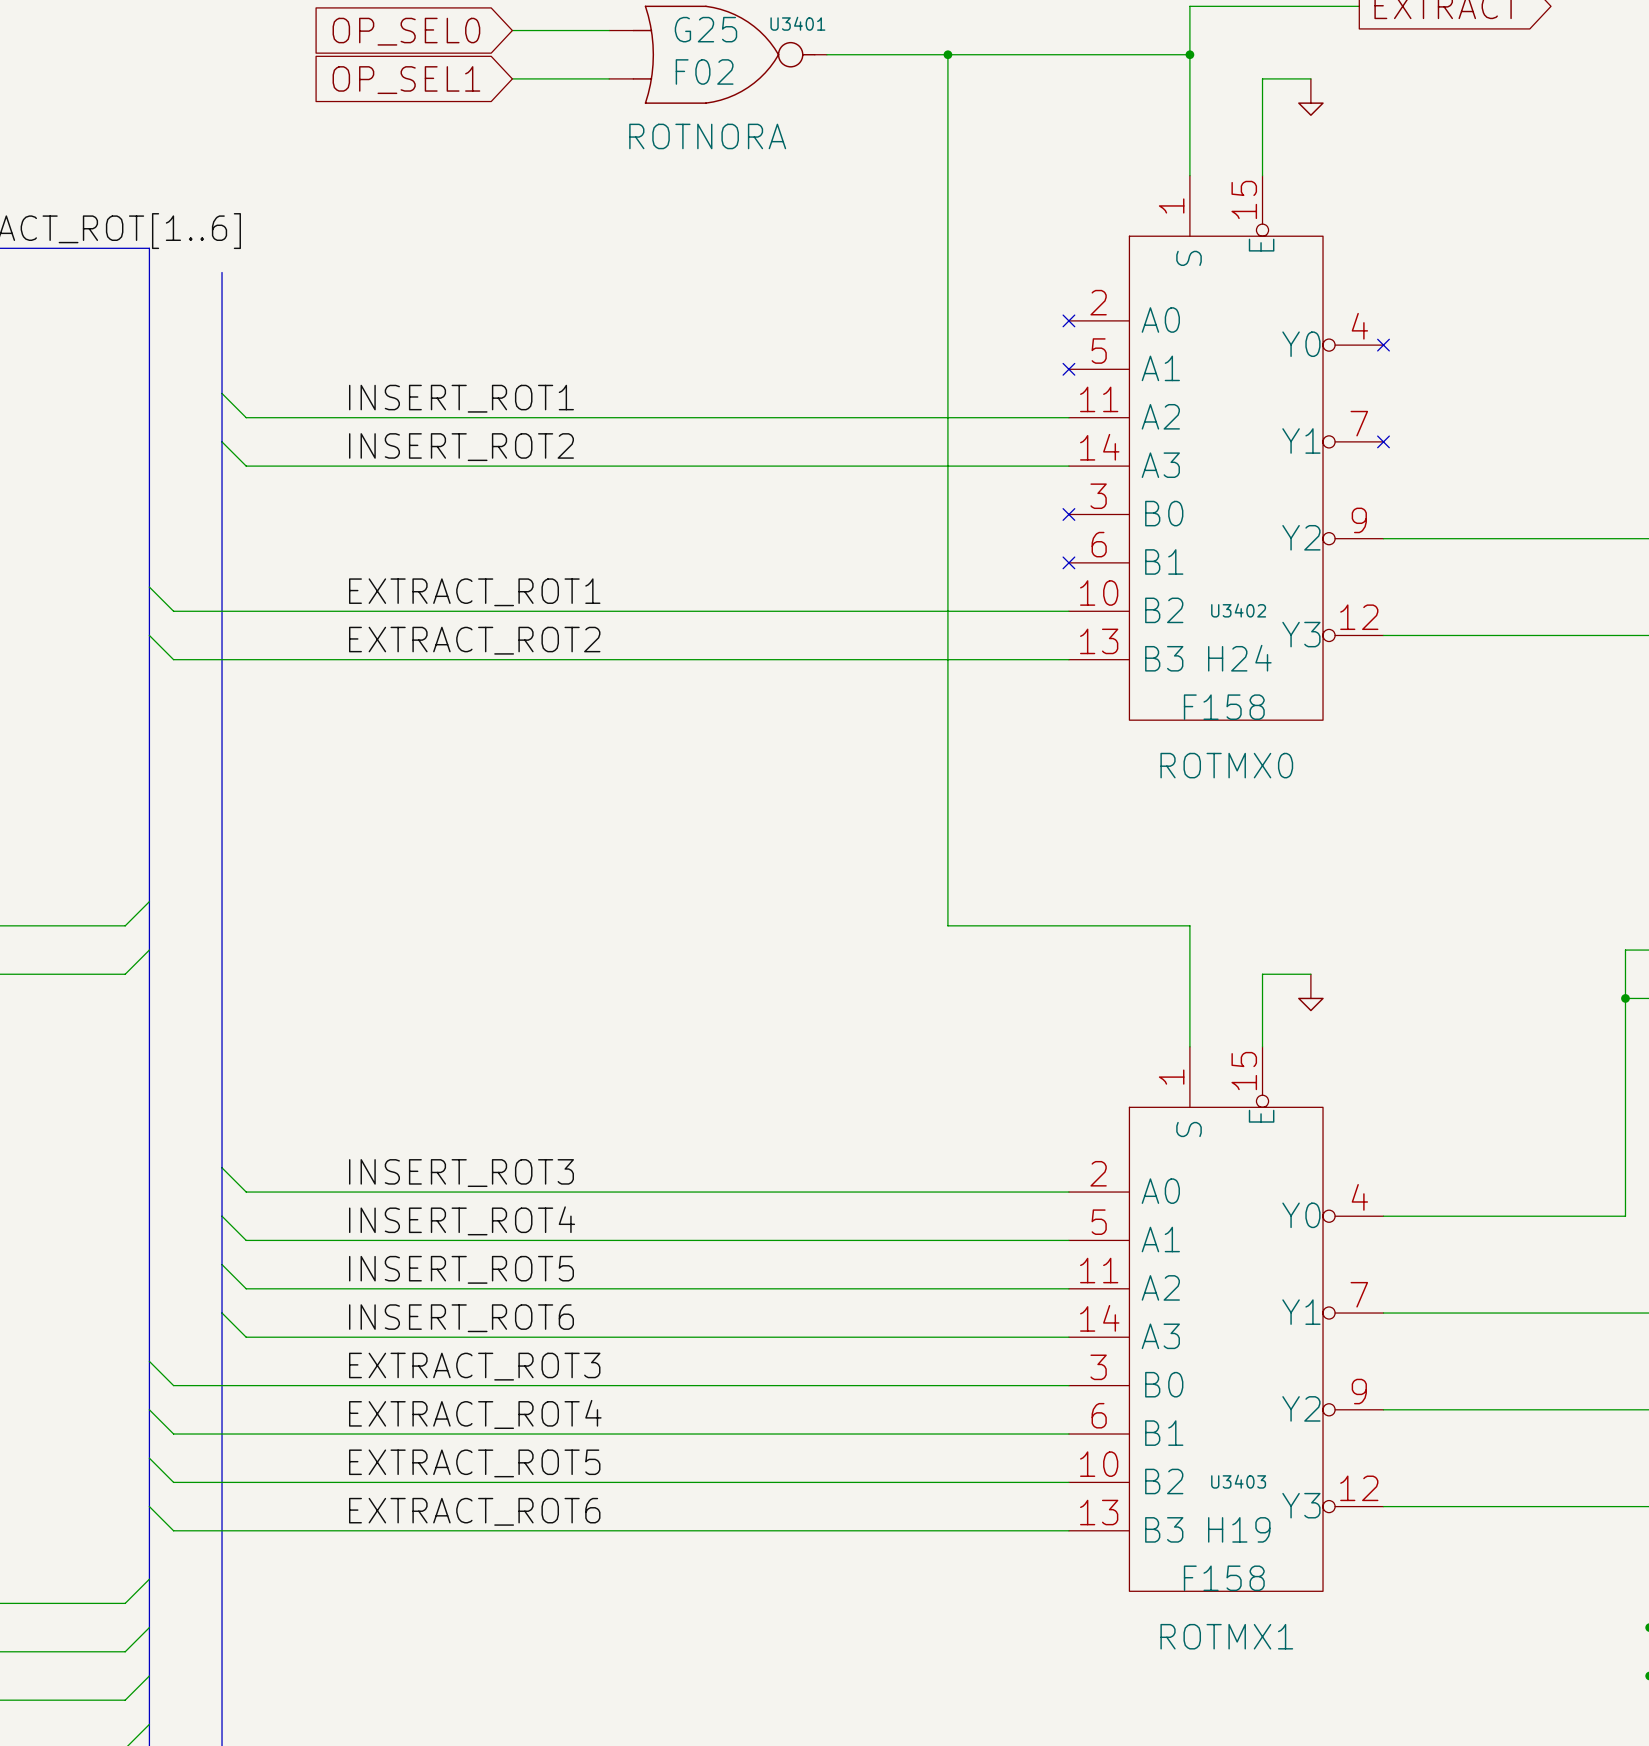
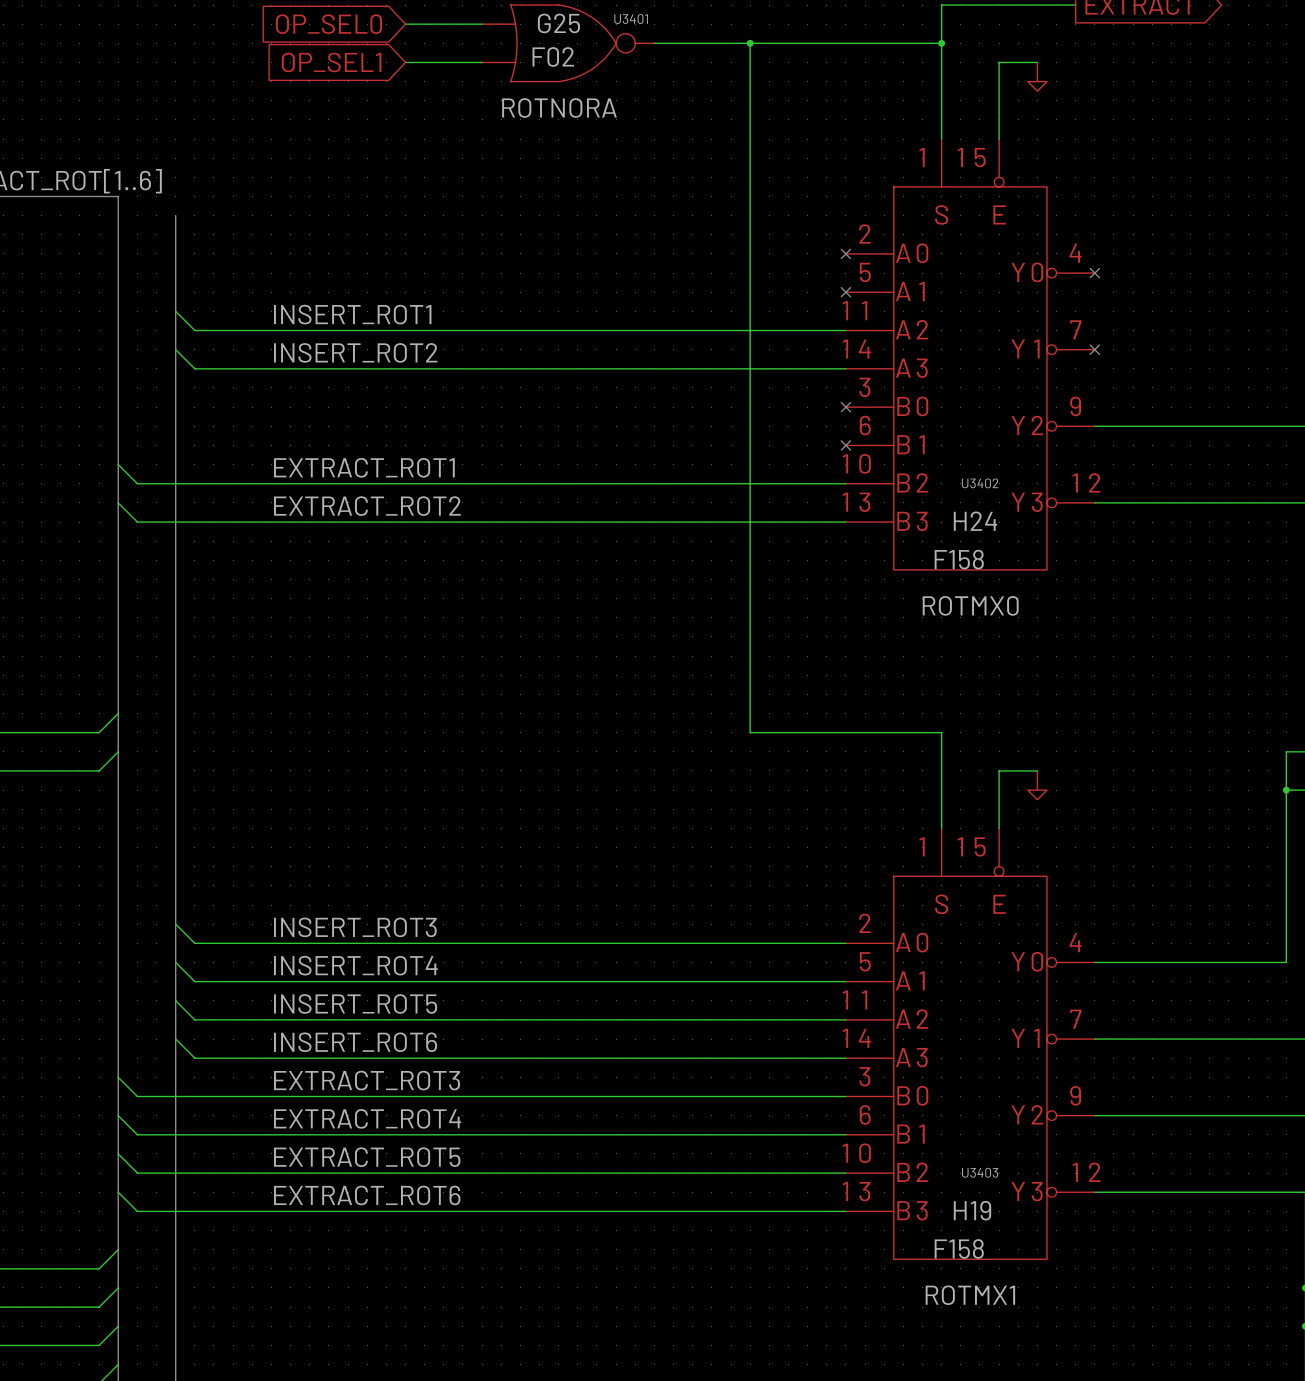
U3402 symbol: [1068, 175, 1384, 721] -> [845, 139, 1095, 570]
U3403 symbol: [1068, 1046, 1384, 1592] -> [845, 828, 1095, 1260]

